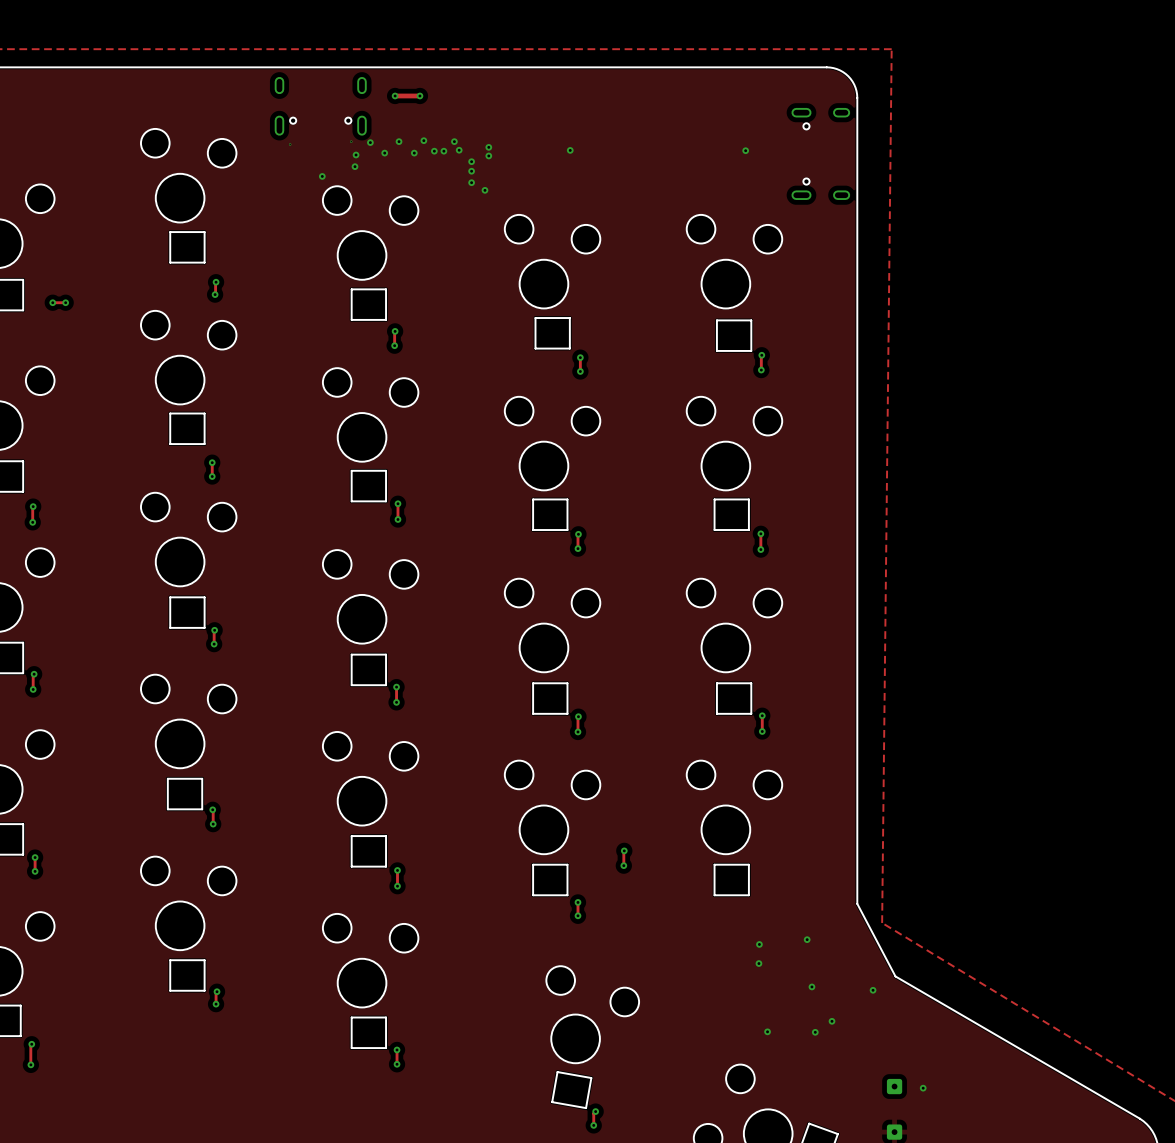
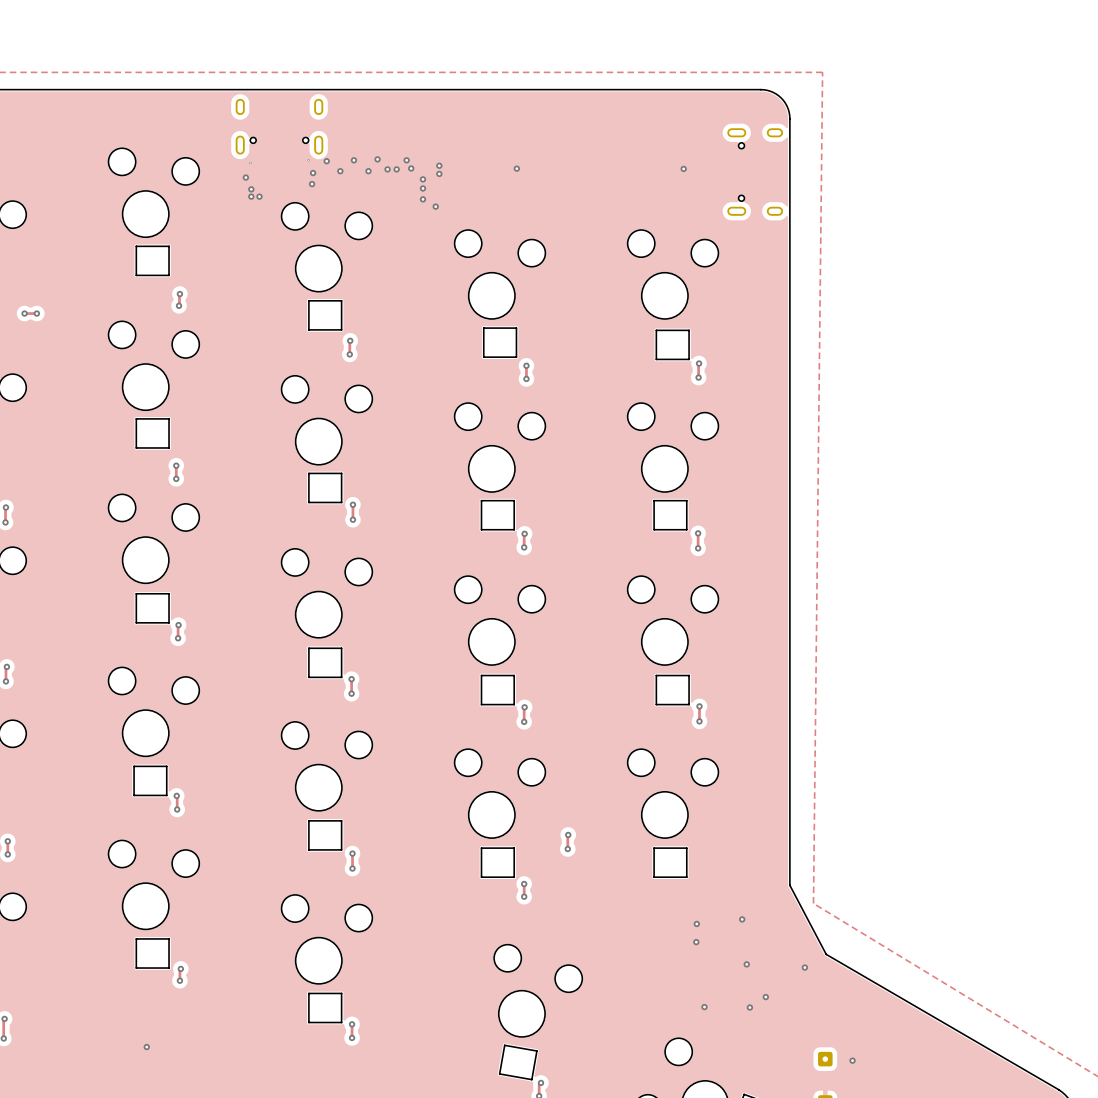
track: (395, 95) (419, 95) -> none
via: (395, 95) -> none
via: (419, 95) -> none
via: none -> (245, 177)
via: none -> (251, 189)
via: (322, 176) -> none
via: none -> (251, 196)
via: none -> (259, 196)
via: none -> (146, 1047)

